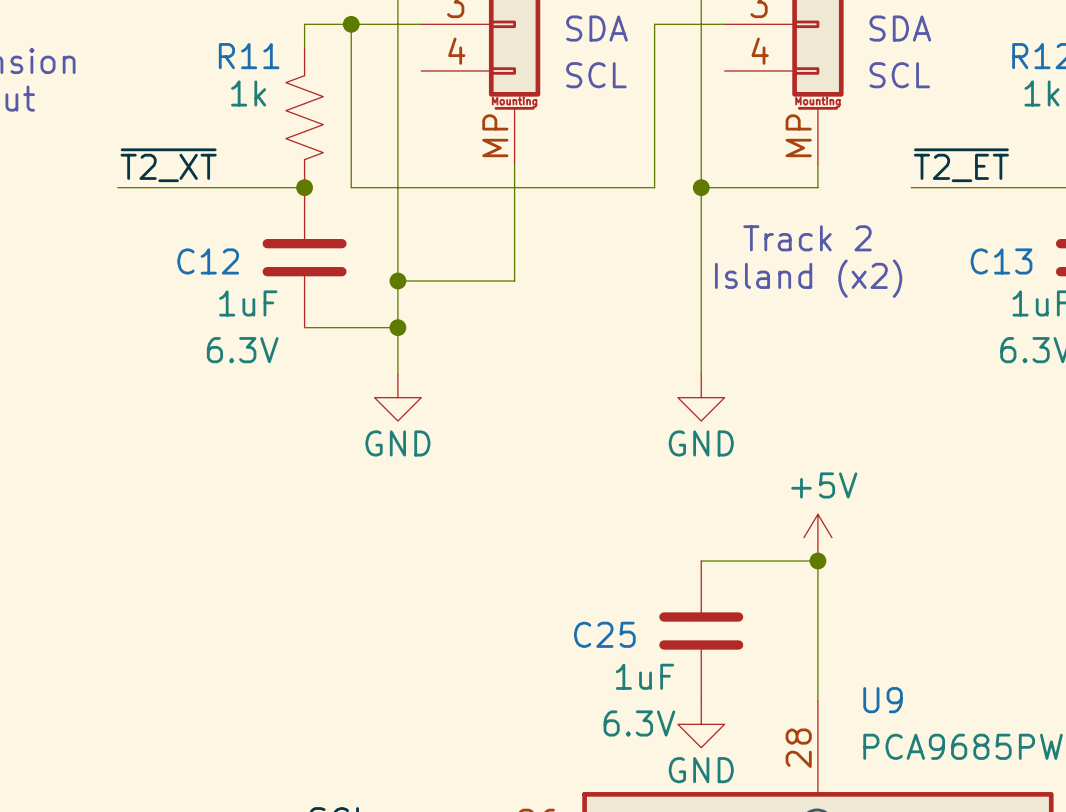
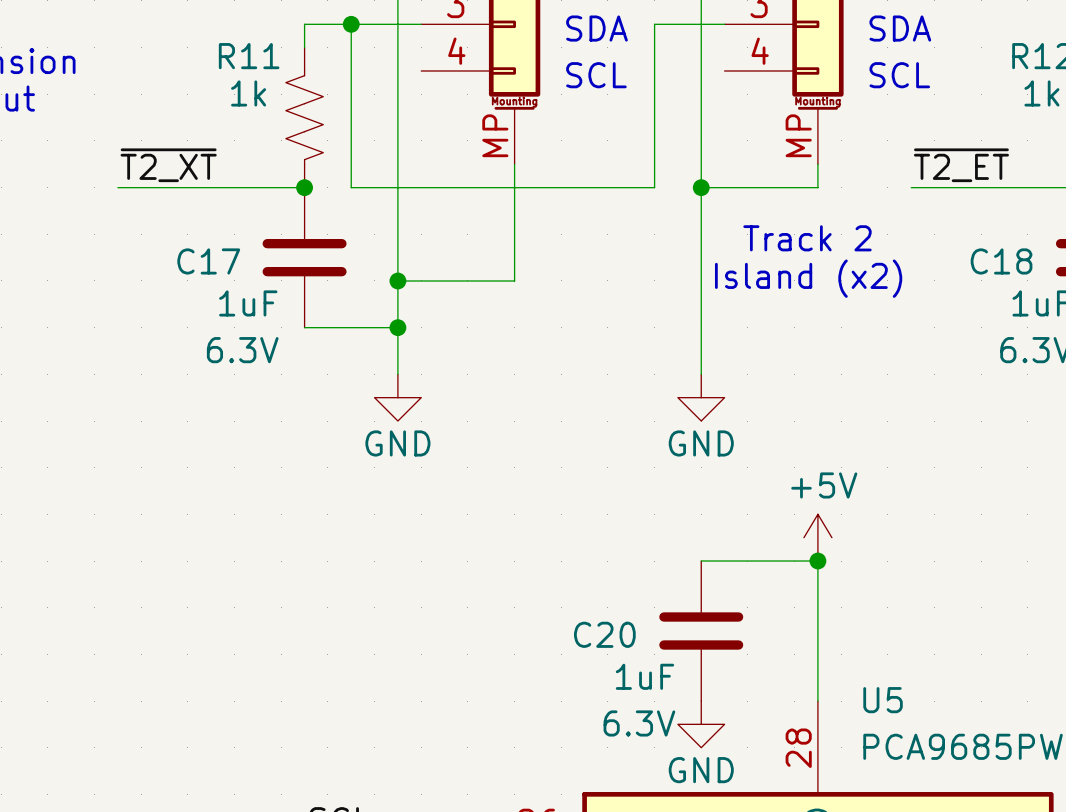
C12 name: C12 (208, 261) -> C17 (208, 261)
C13 name: C13 (1001, 261) -> C18 (1001, 261)
C25 name: C25 (604, 634) -> C20 (604, 634)
U9 name: U9 (883, 700) -> U5 (883, 700)

